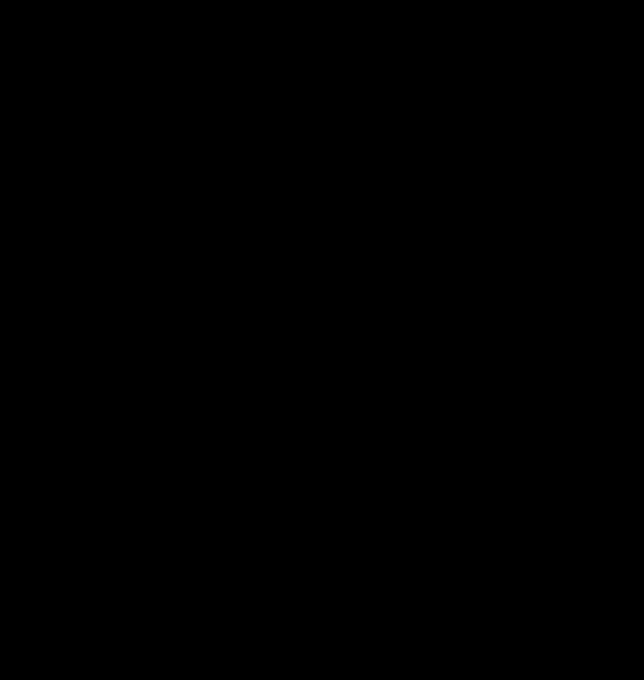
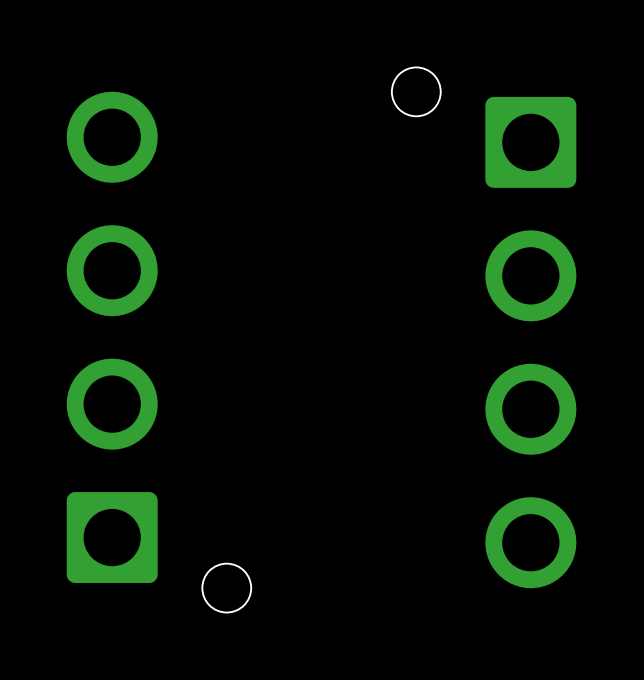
part: none -> (484, 327)
part: none -> (158, 352)

